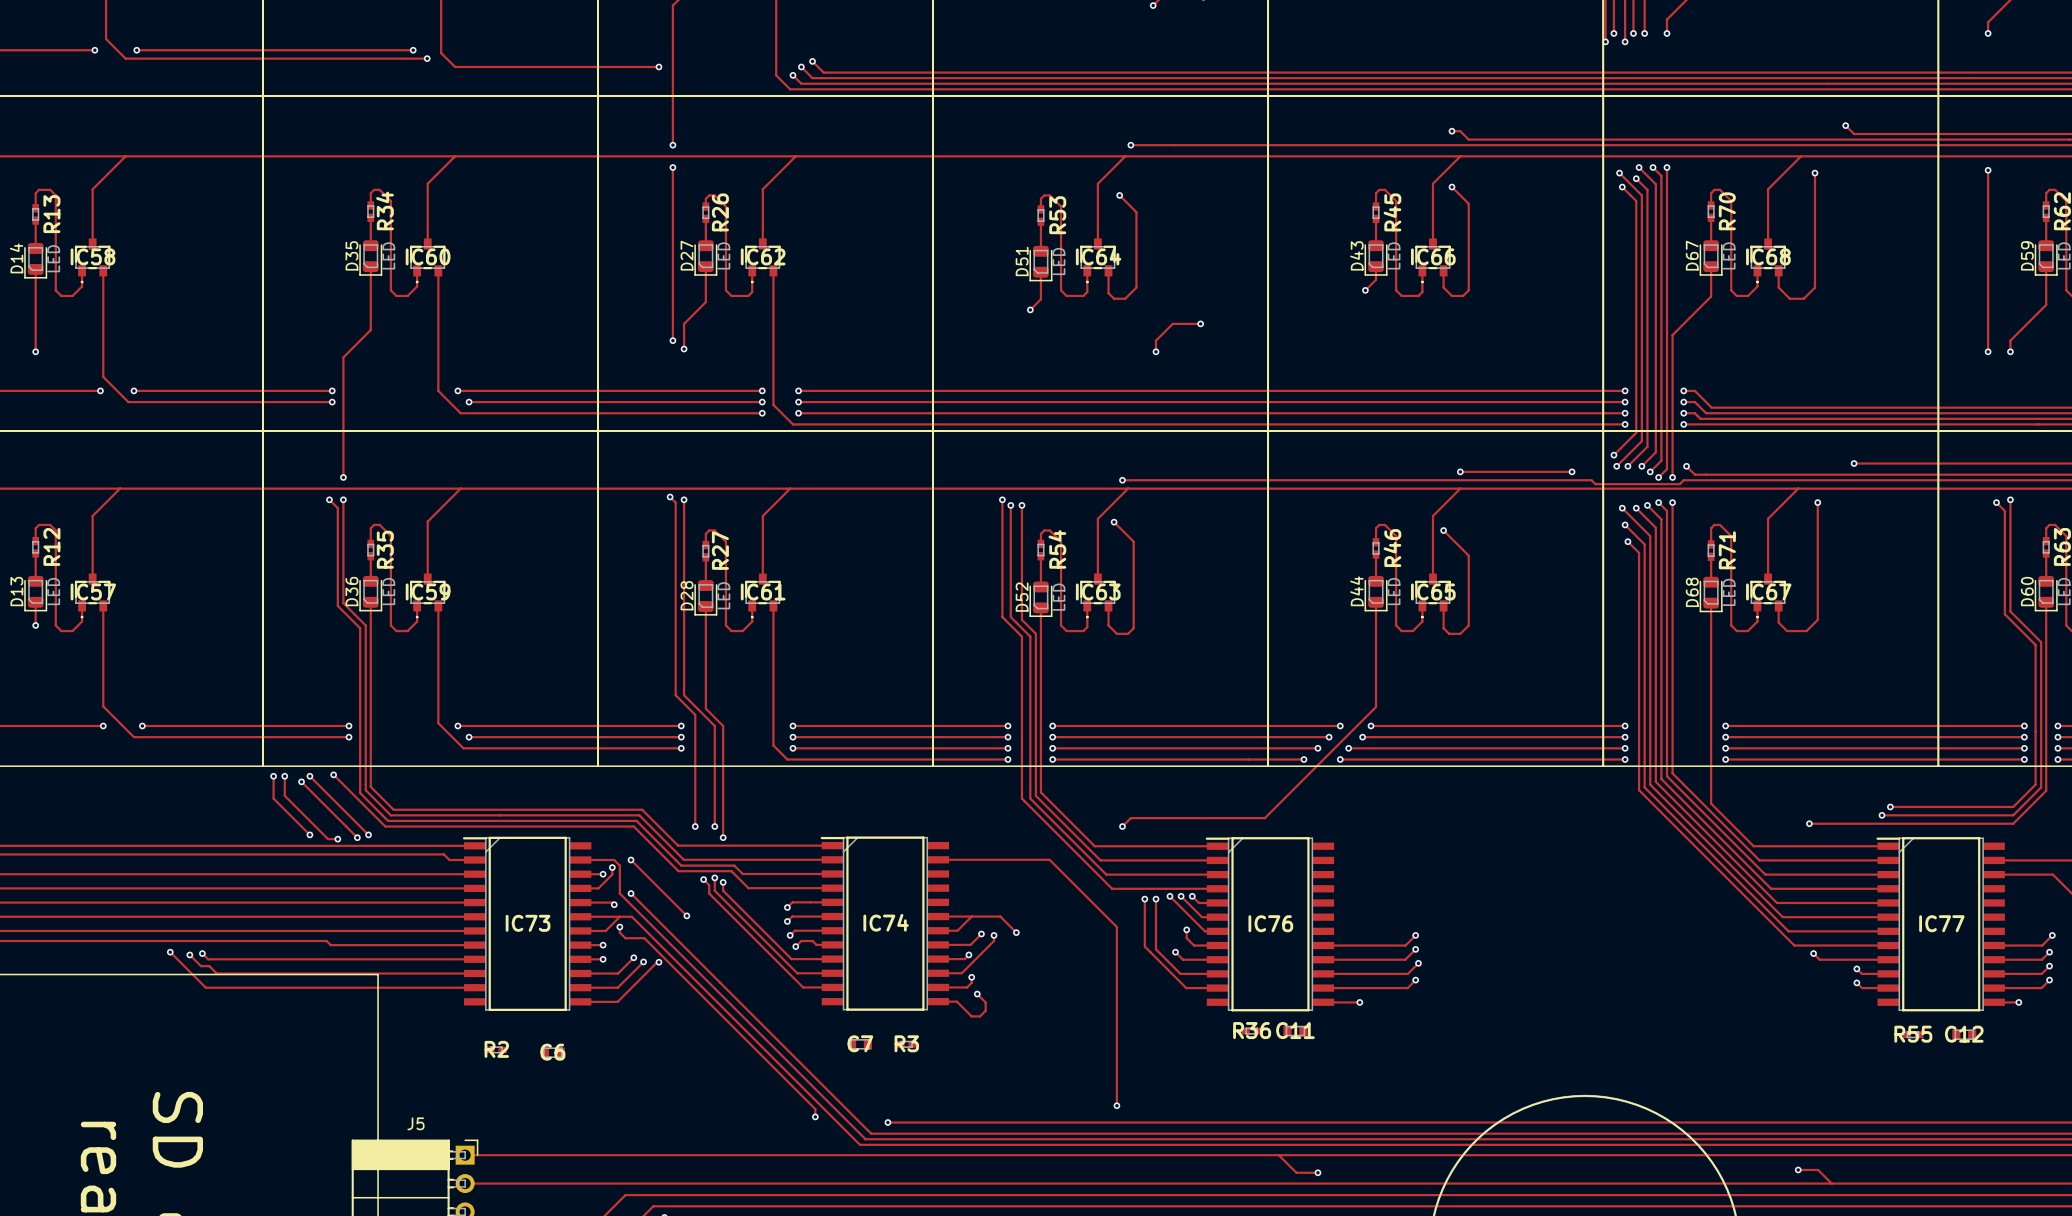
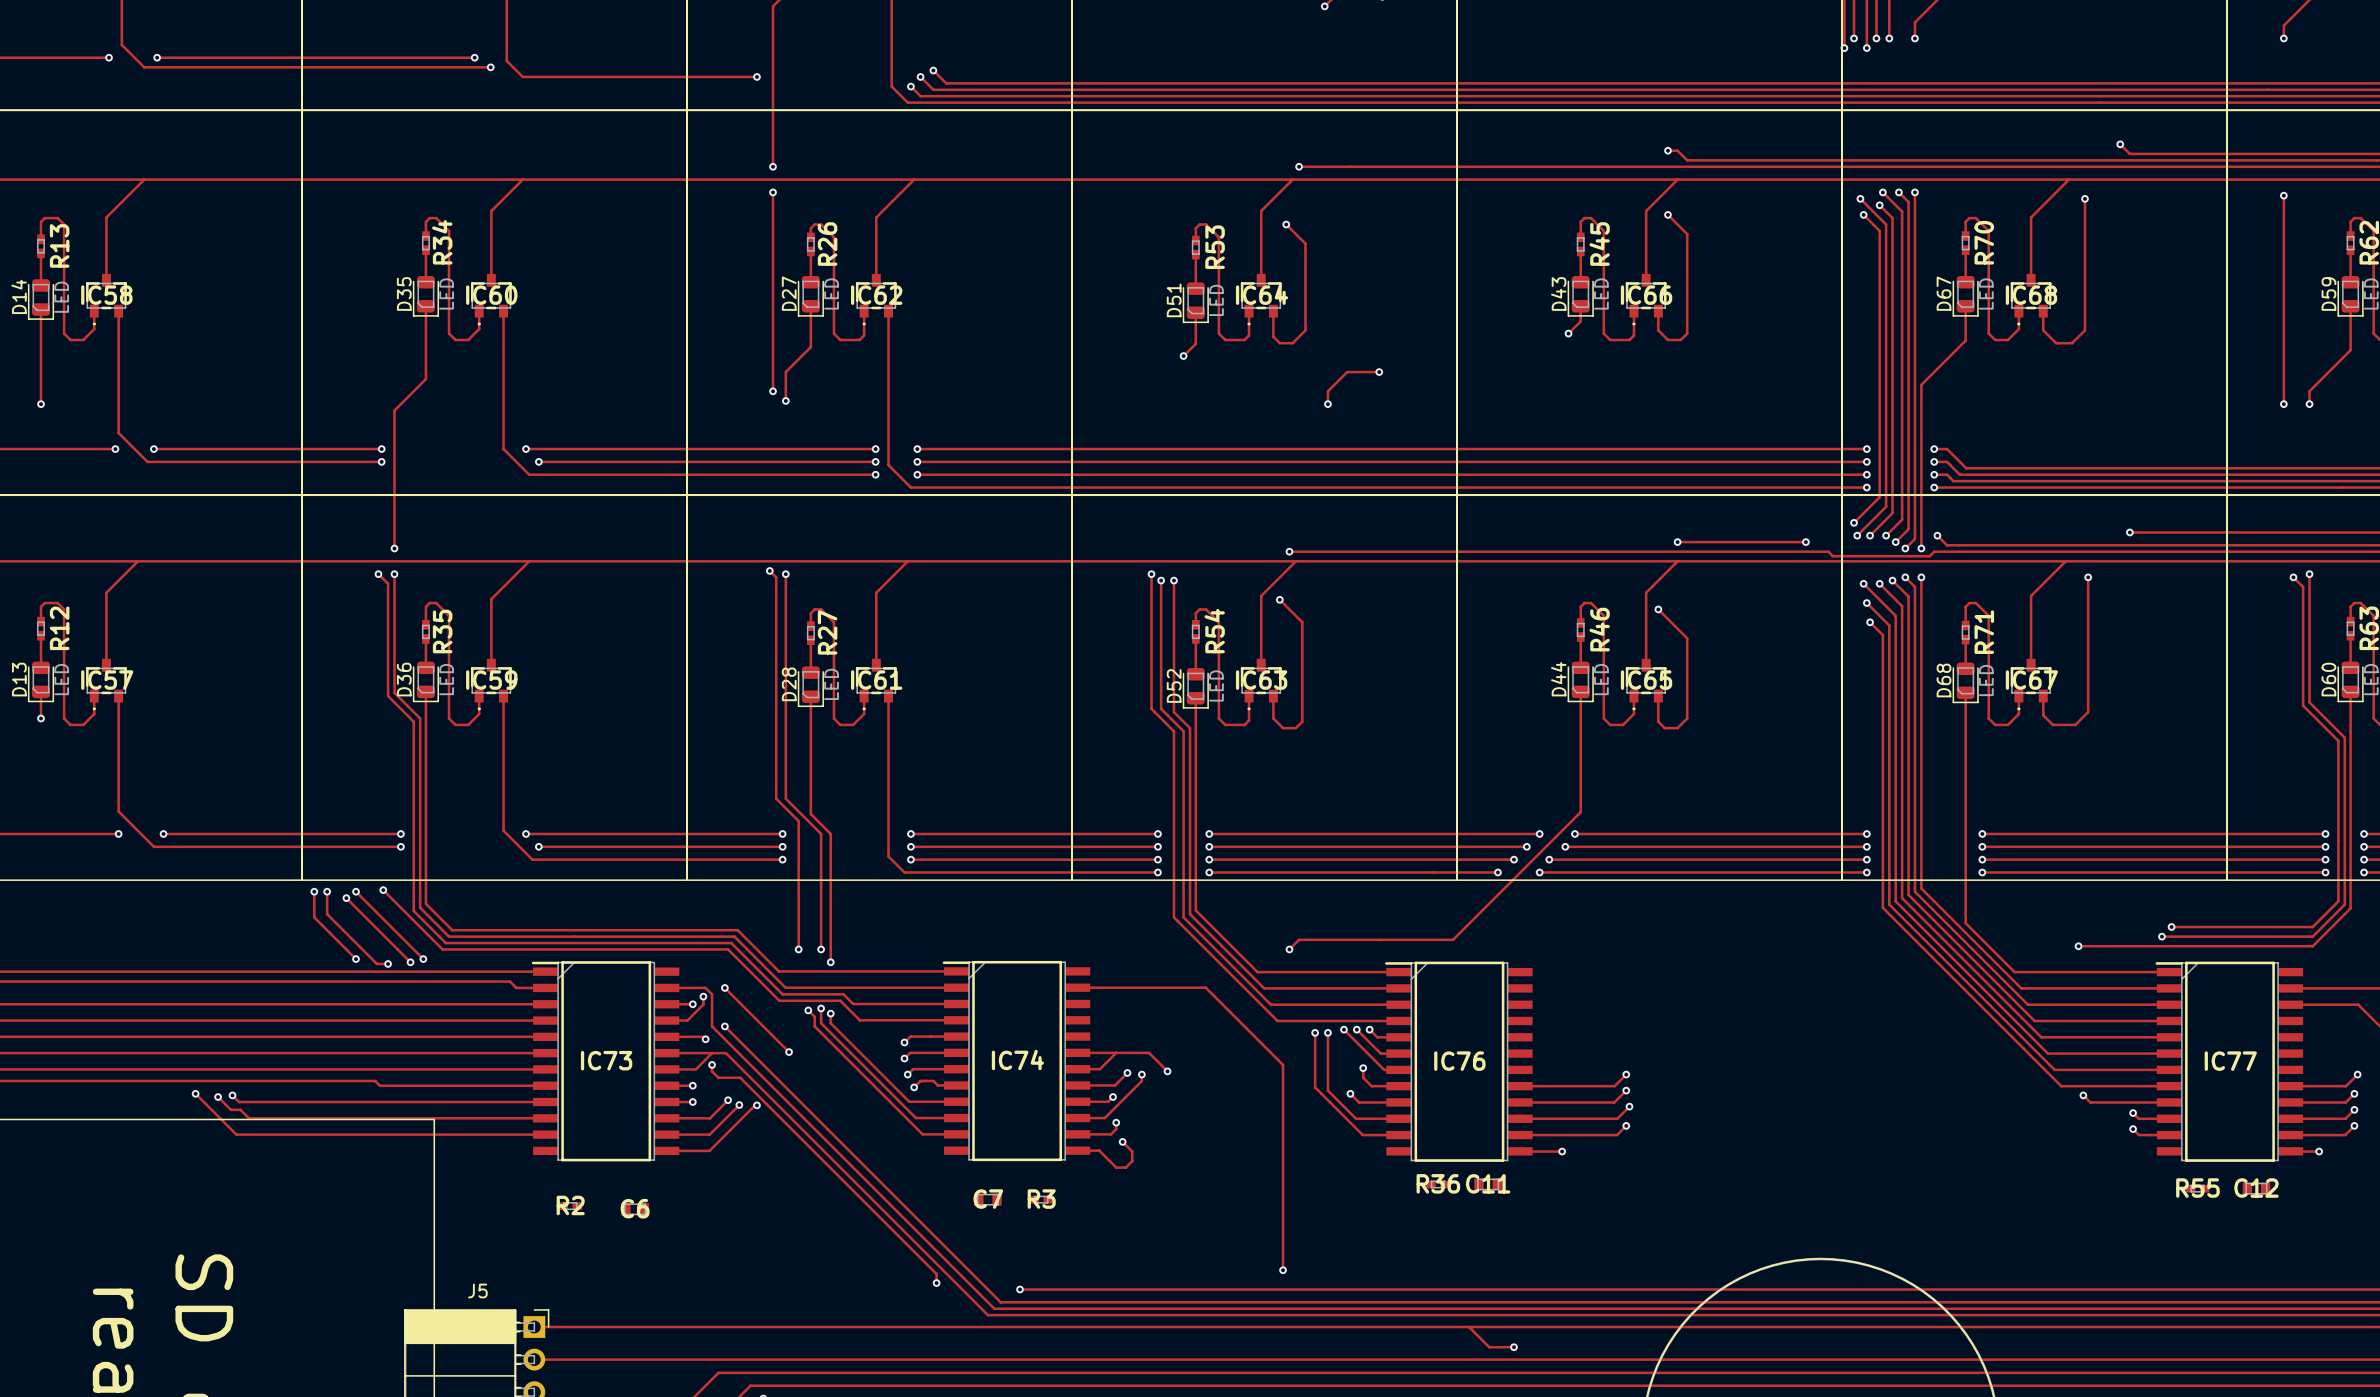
track: (1798, 1169) (1818, 1169) (1831, 1183) -> none
via: (1798, 1169) -> none

